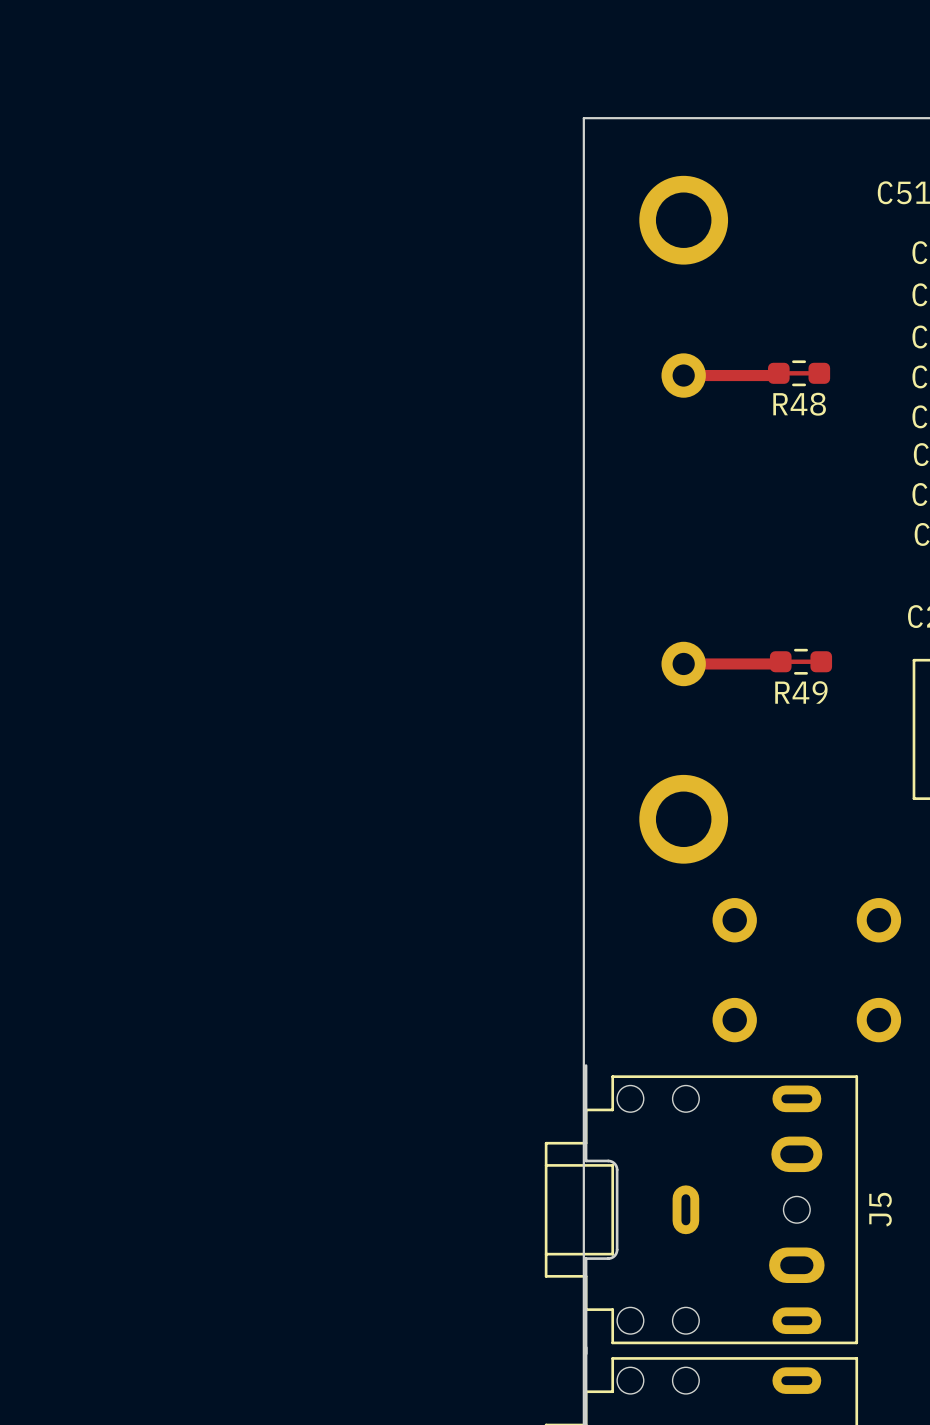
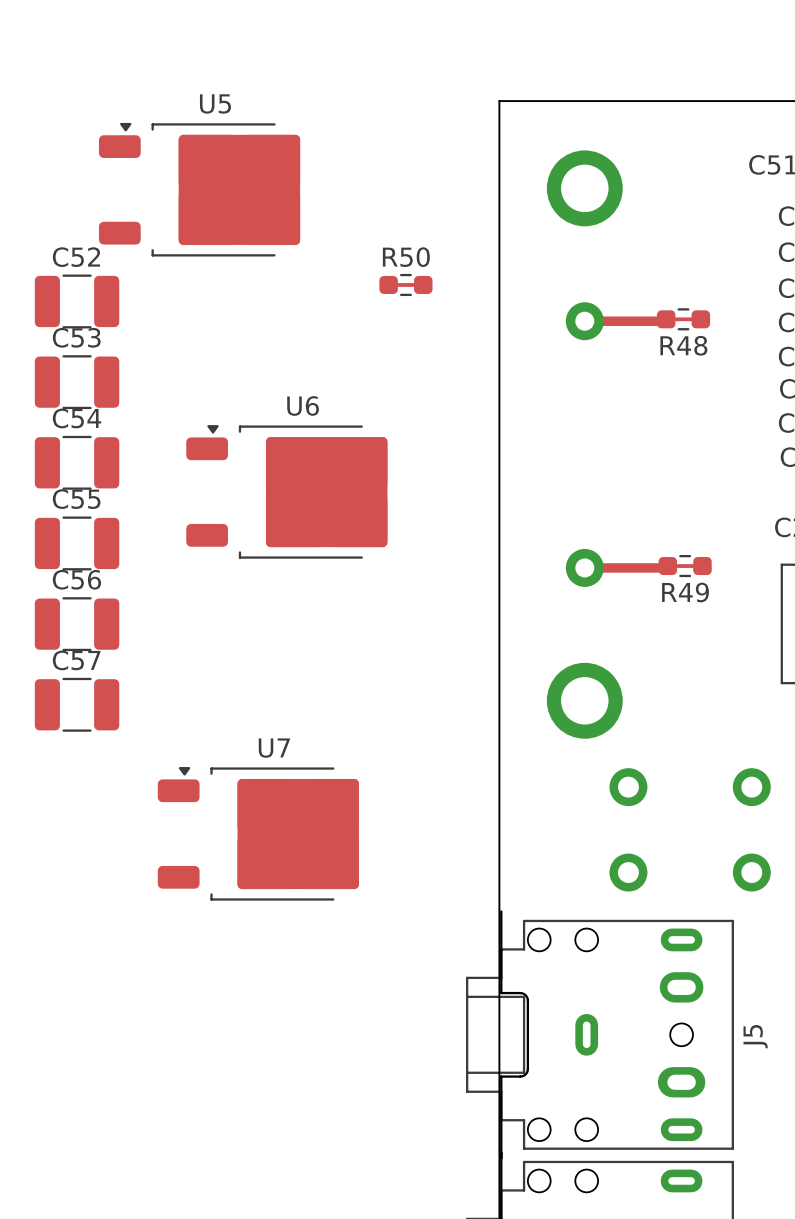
U5: none -> (199, 189)
R50: none -> (405, 284)
C52: none -> (77, 301)
C53: none -> (77, 382)
C54: none -> (77, 462)
U6: none -> (286, 491)
C55: none -> (77, 543)
C56: none -> (77, 624)
C57: none -> (77, 704)
U7: none -> (258, 833)

